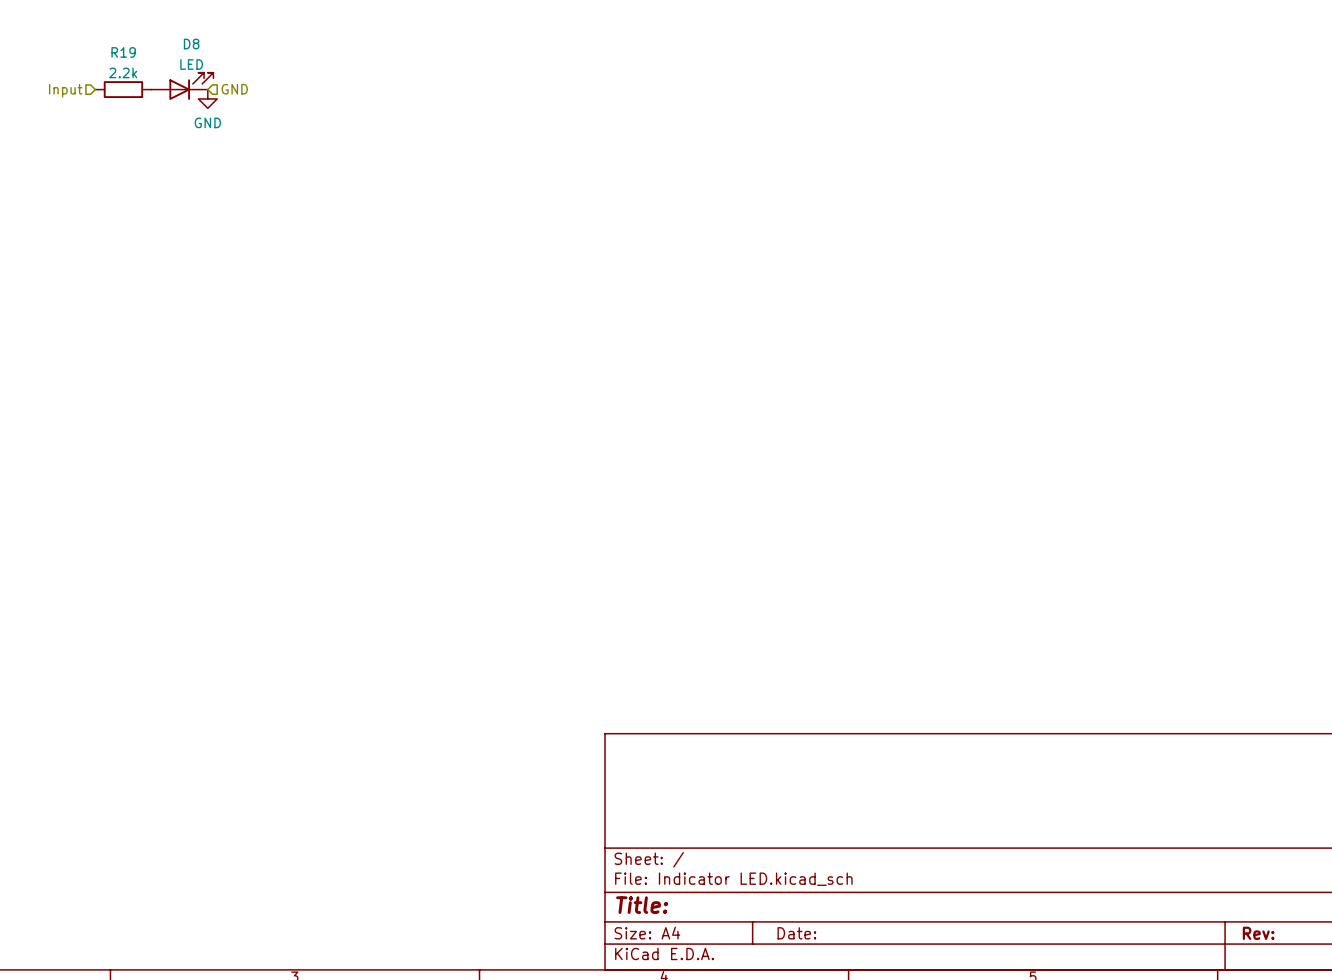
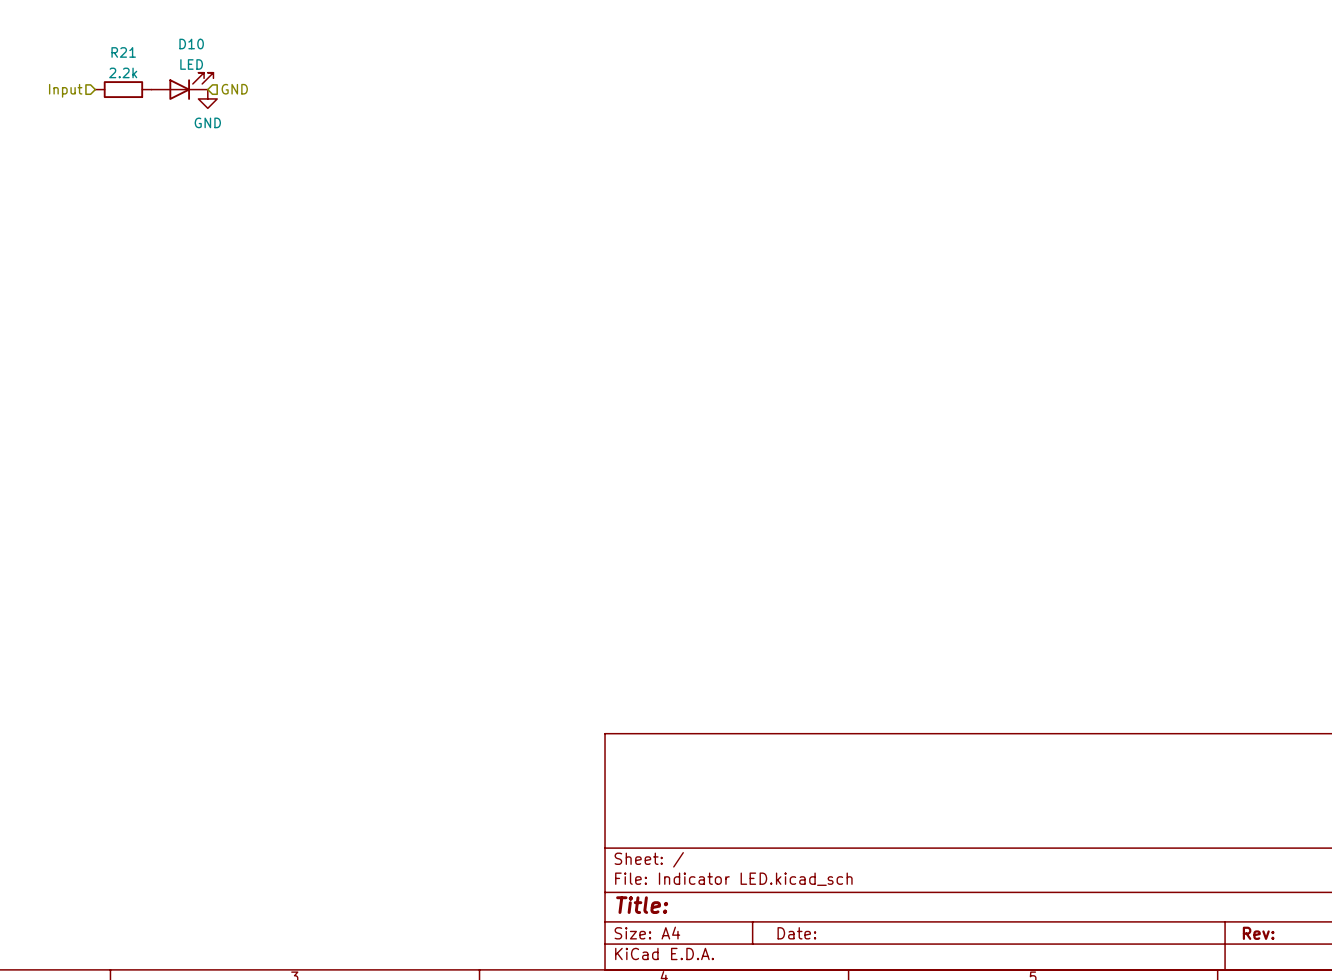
D8 name: D8 (191, 44) -> D10 (191, 44)
R19 name: R19 (123, 52) -> R21 (123, 52)

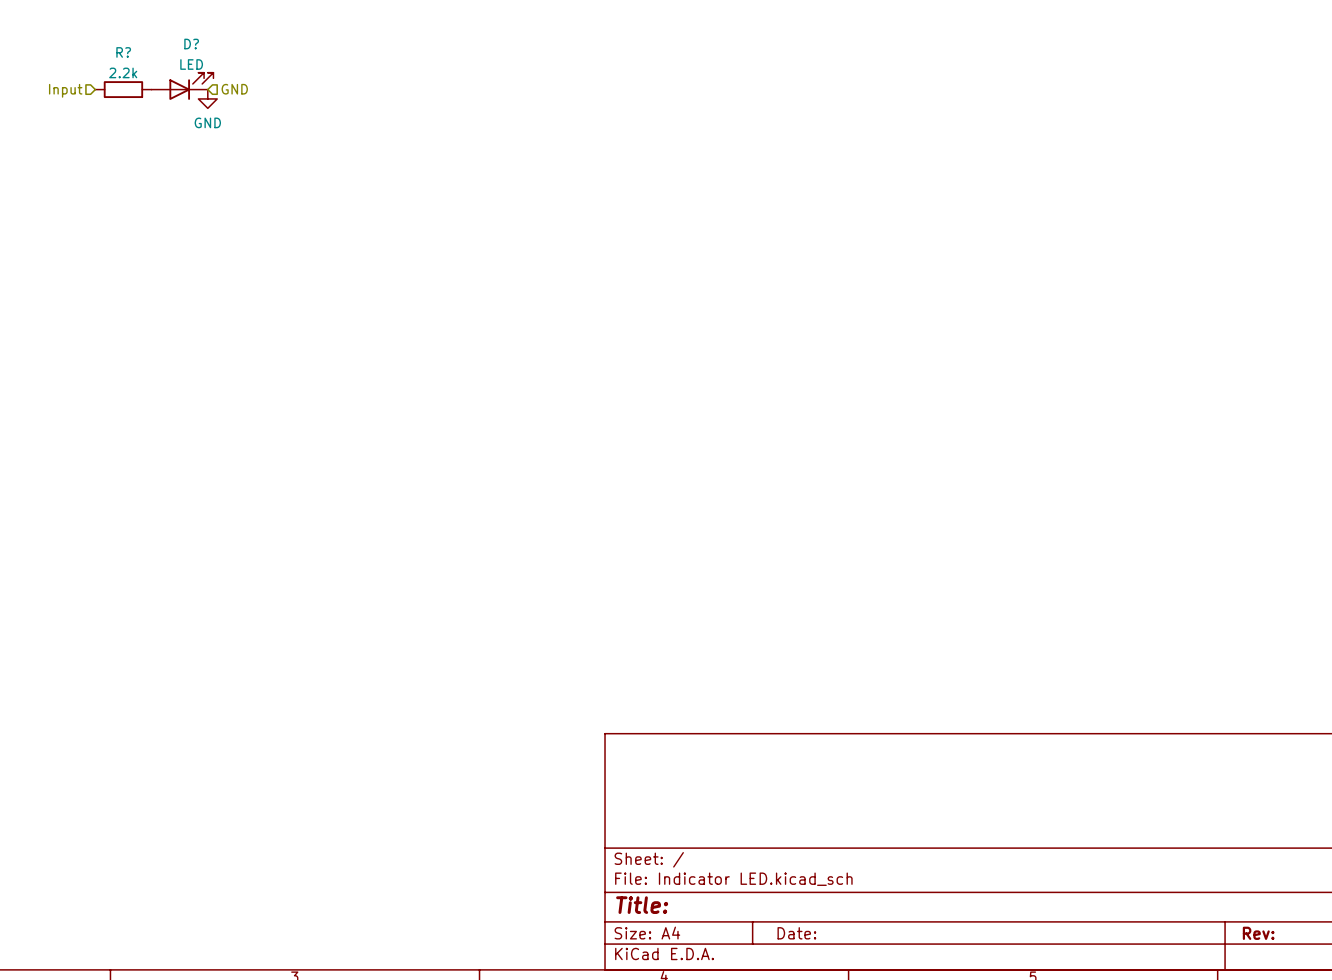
D10 name: D10 (191, 44) -> D? (191, 44)
R21 name: R21 (123, 52) -> R? (123, 52)

